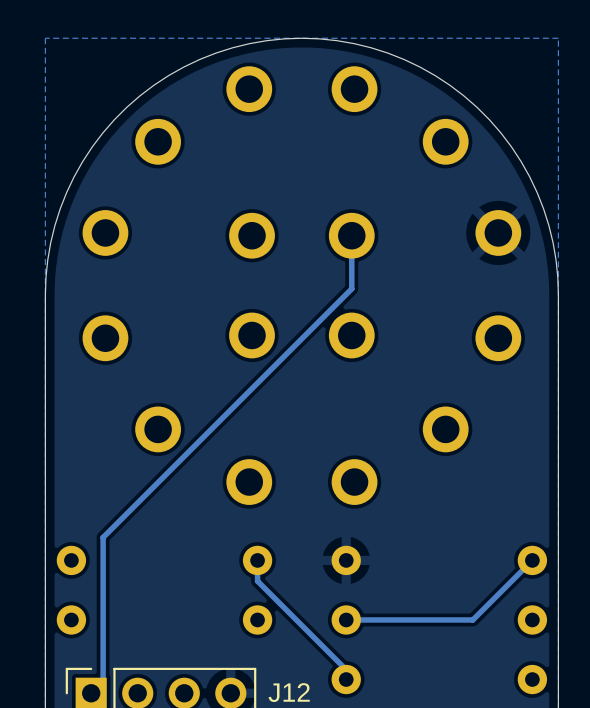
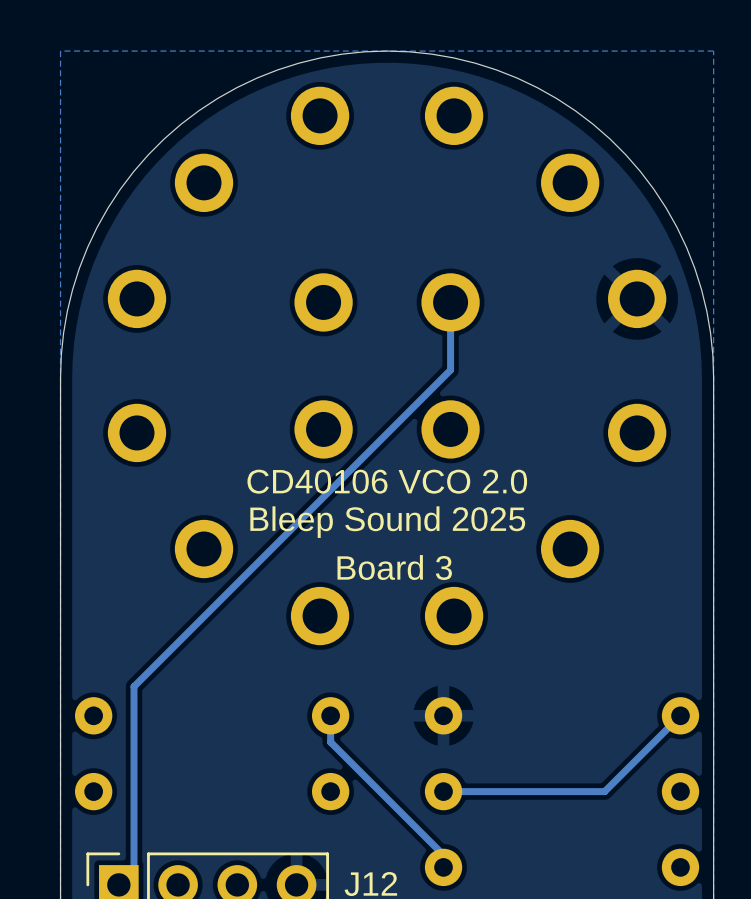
text: none -> CD40106 VCO 2.0 (387, 481)
text: none -> Bleep Sound 2025 (387, 522)
text: none -> Board 3 (394, 567)

